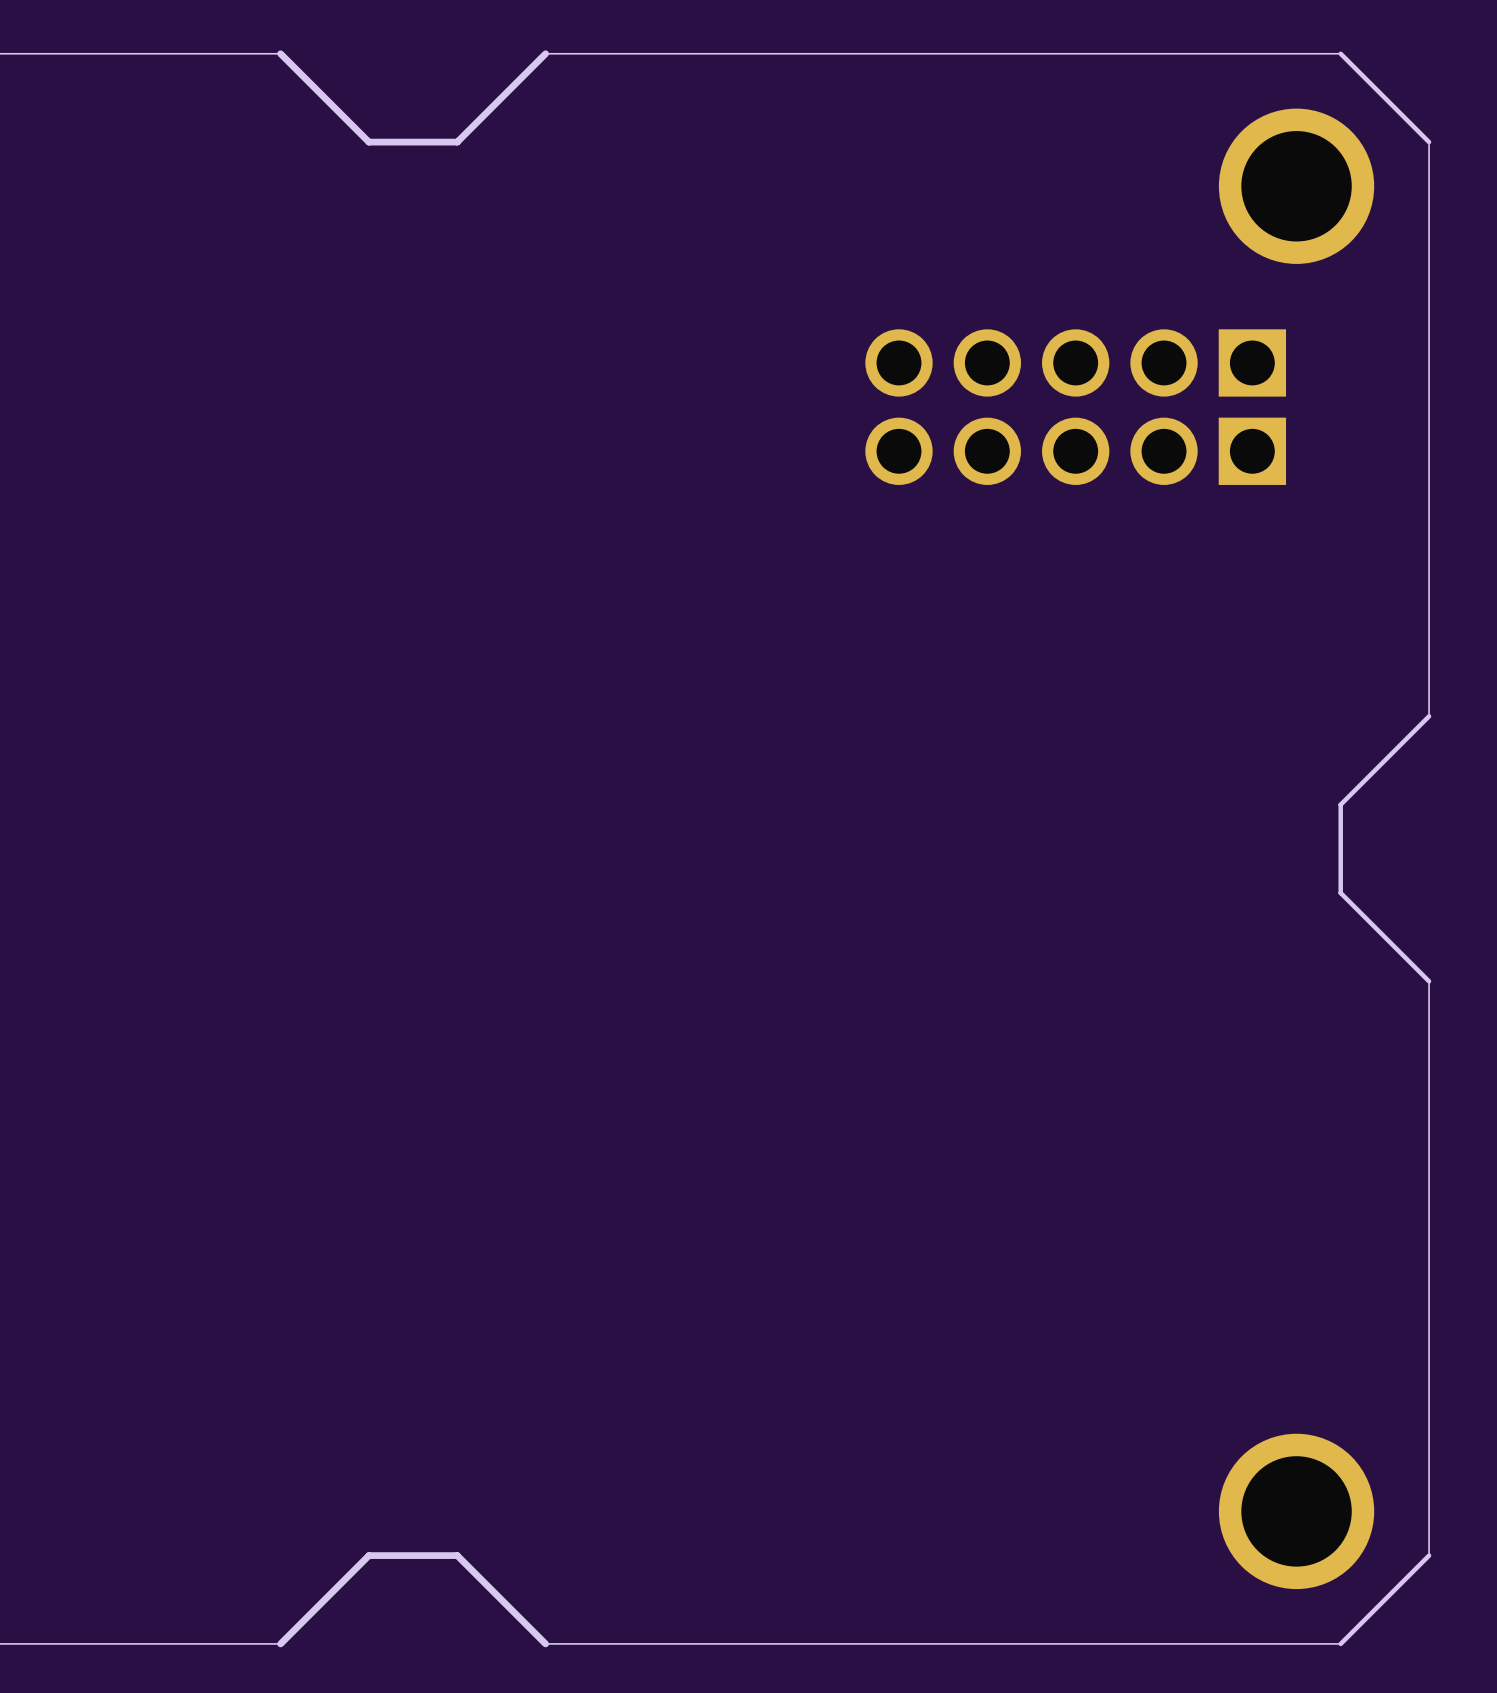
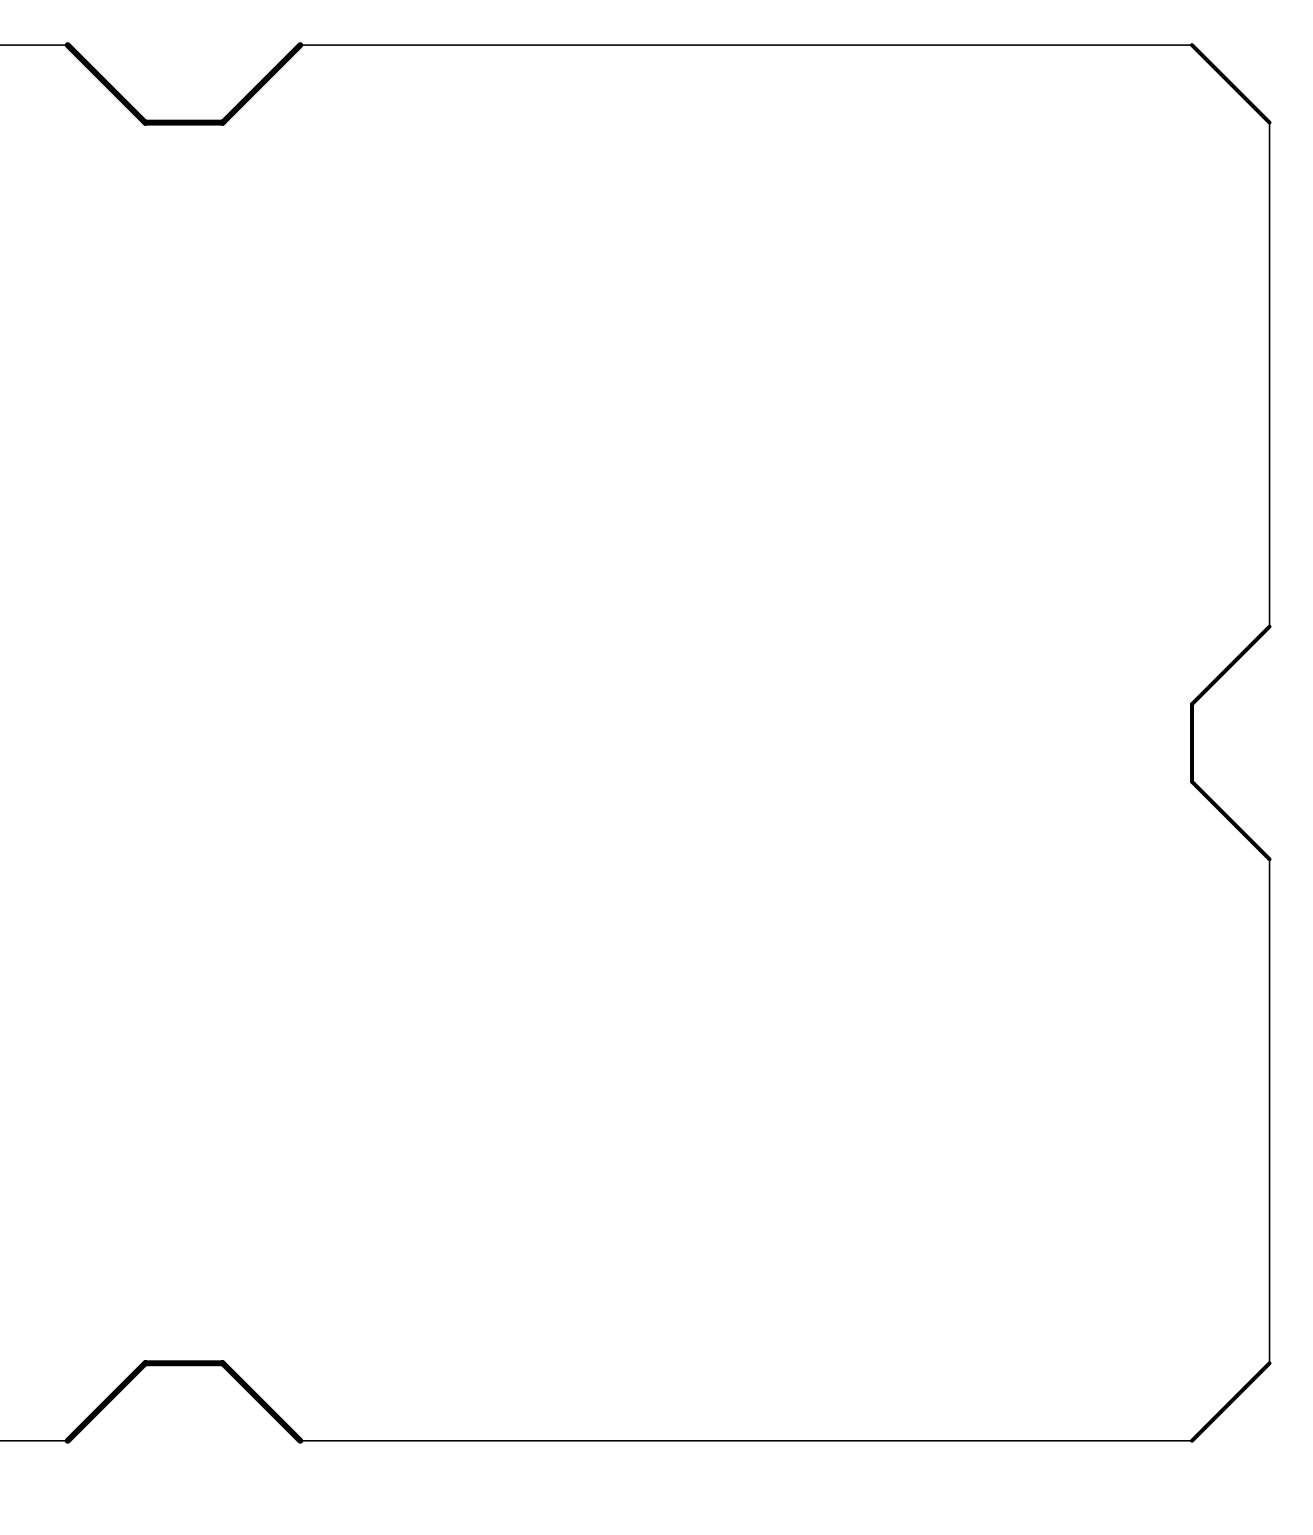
board edge: (545, 53) (457, 142) (368, 142) (280, 53) (59, 53) -> (494, 45) (300, 45) (222, 122) (145, 122) (67, 45)
part: (1296, 186) -> none
part: (1075, 362) -> none
part: (1075, 451) -> none
part: (1296, 1511) -> none
board edge: (545, 1643) (457, 1555) (368, 1555) (280, 1643) (59, 1643) -> (494, 1440) (300, 1440) (222, 1363) (145, 1363) (67, 1440)

